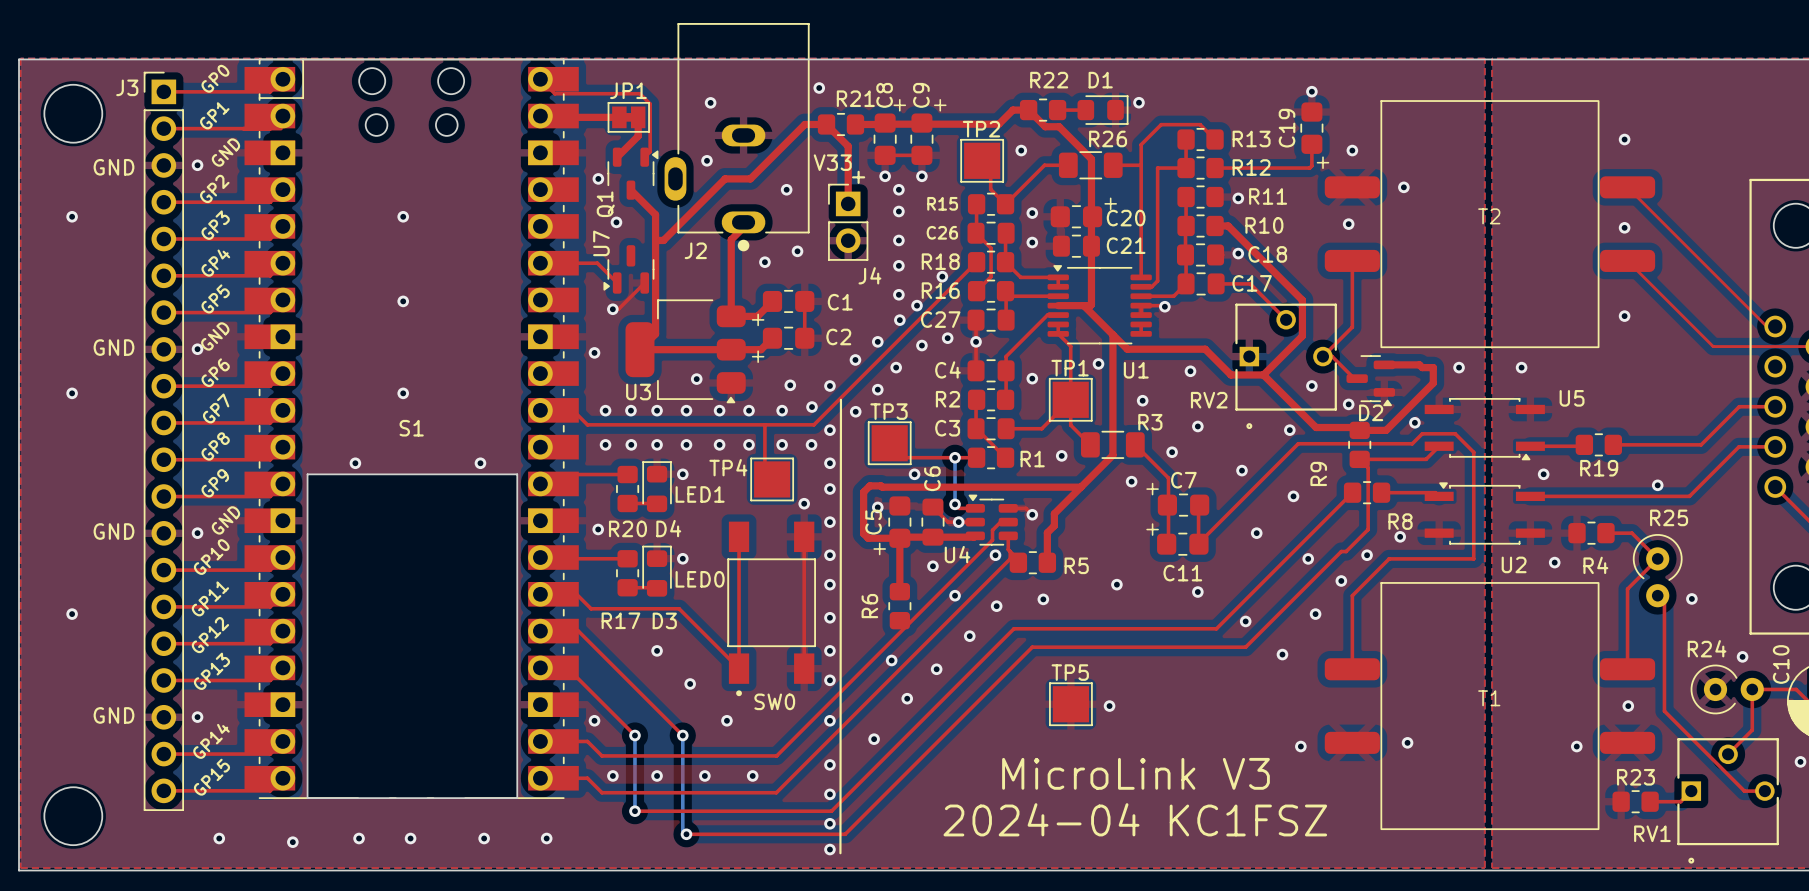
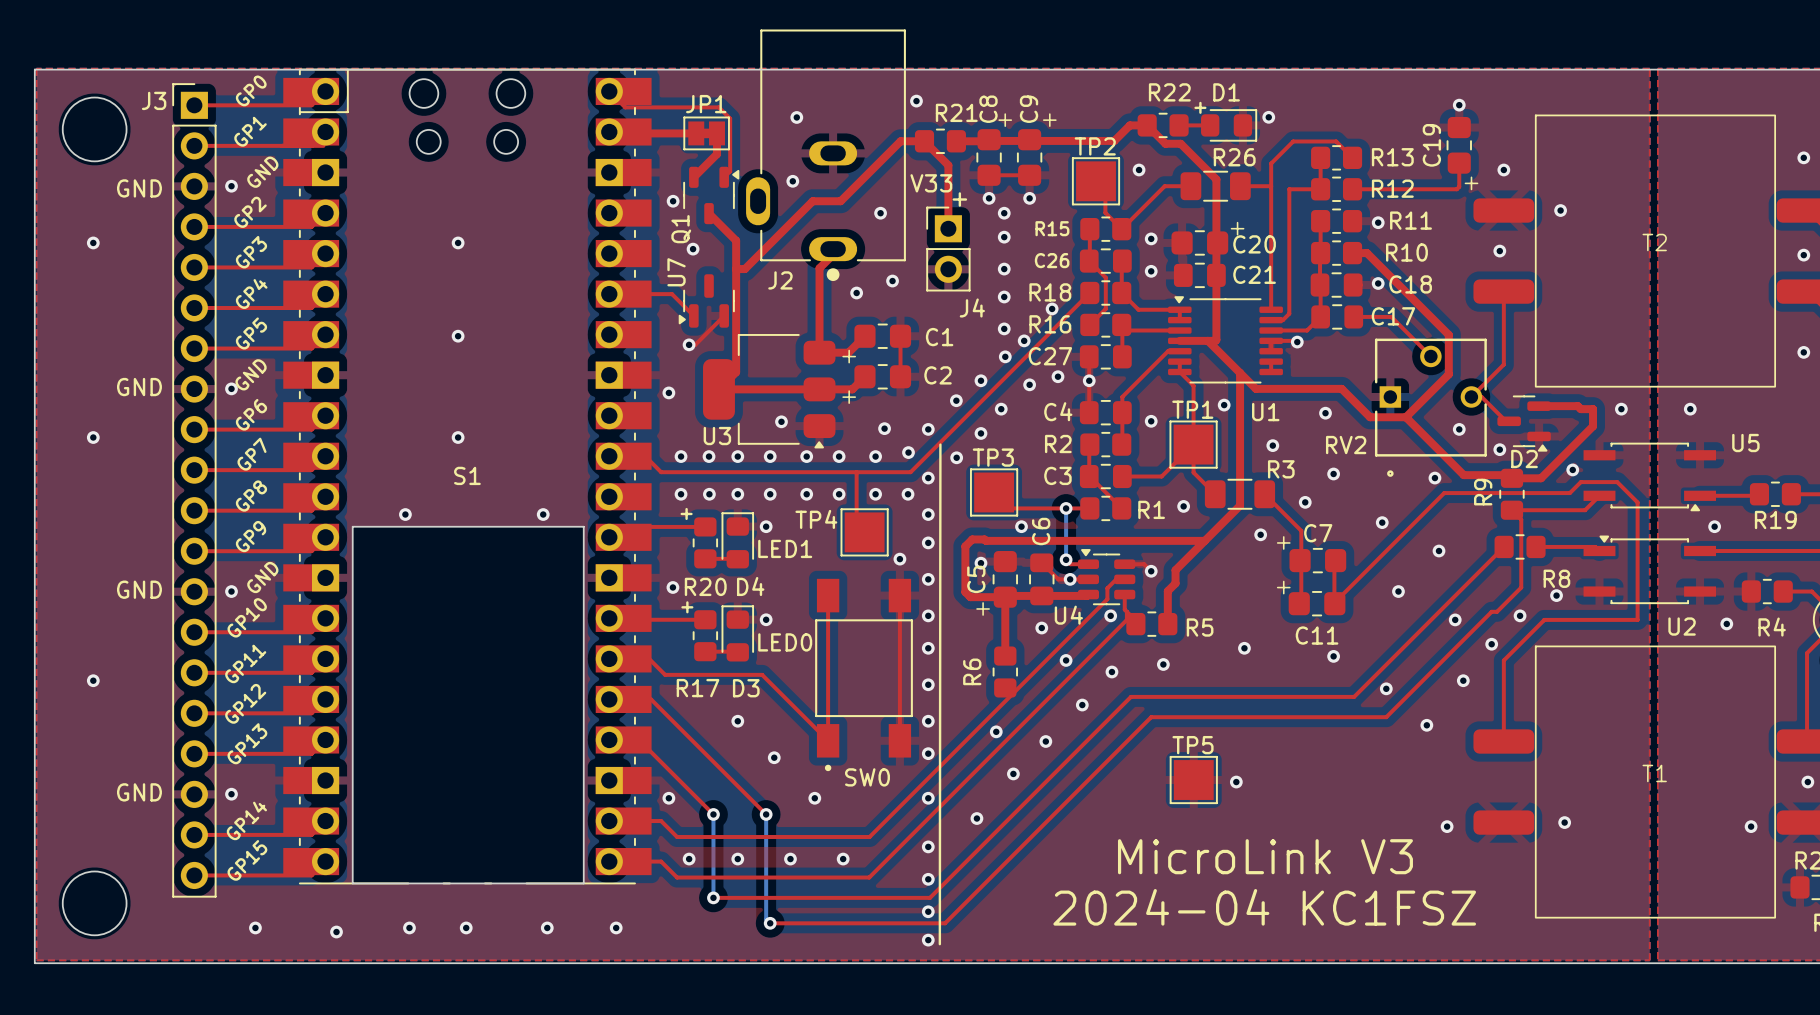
text: none -> + (1200, 107)
text: none -> + (686, 513)
R9 name position: R9 (1318, 473) -> R9 (1483, 492)
text: none -> + (687, 607)

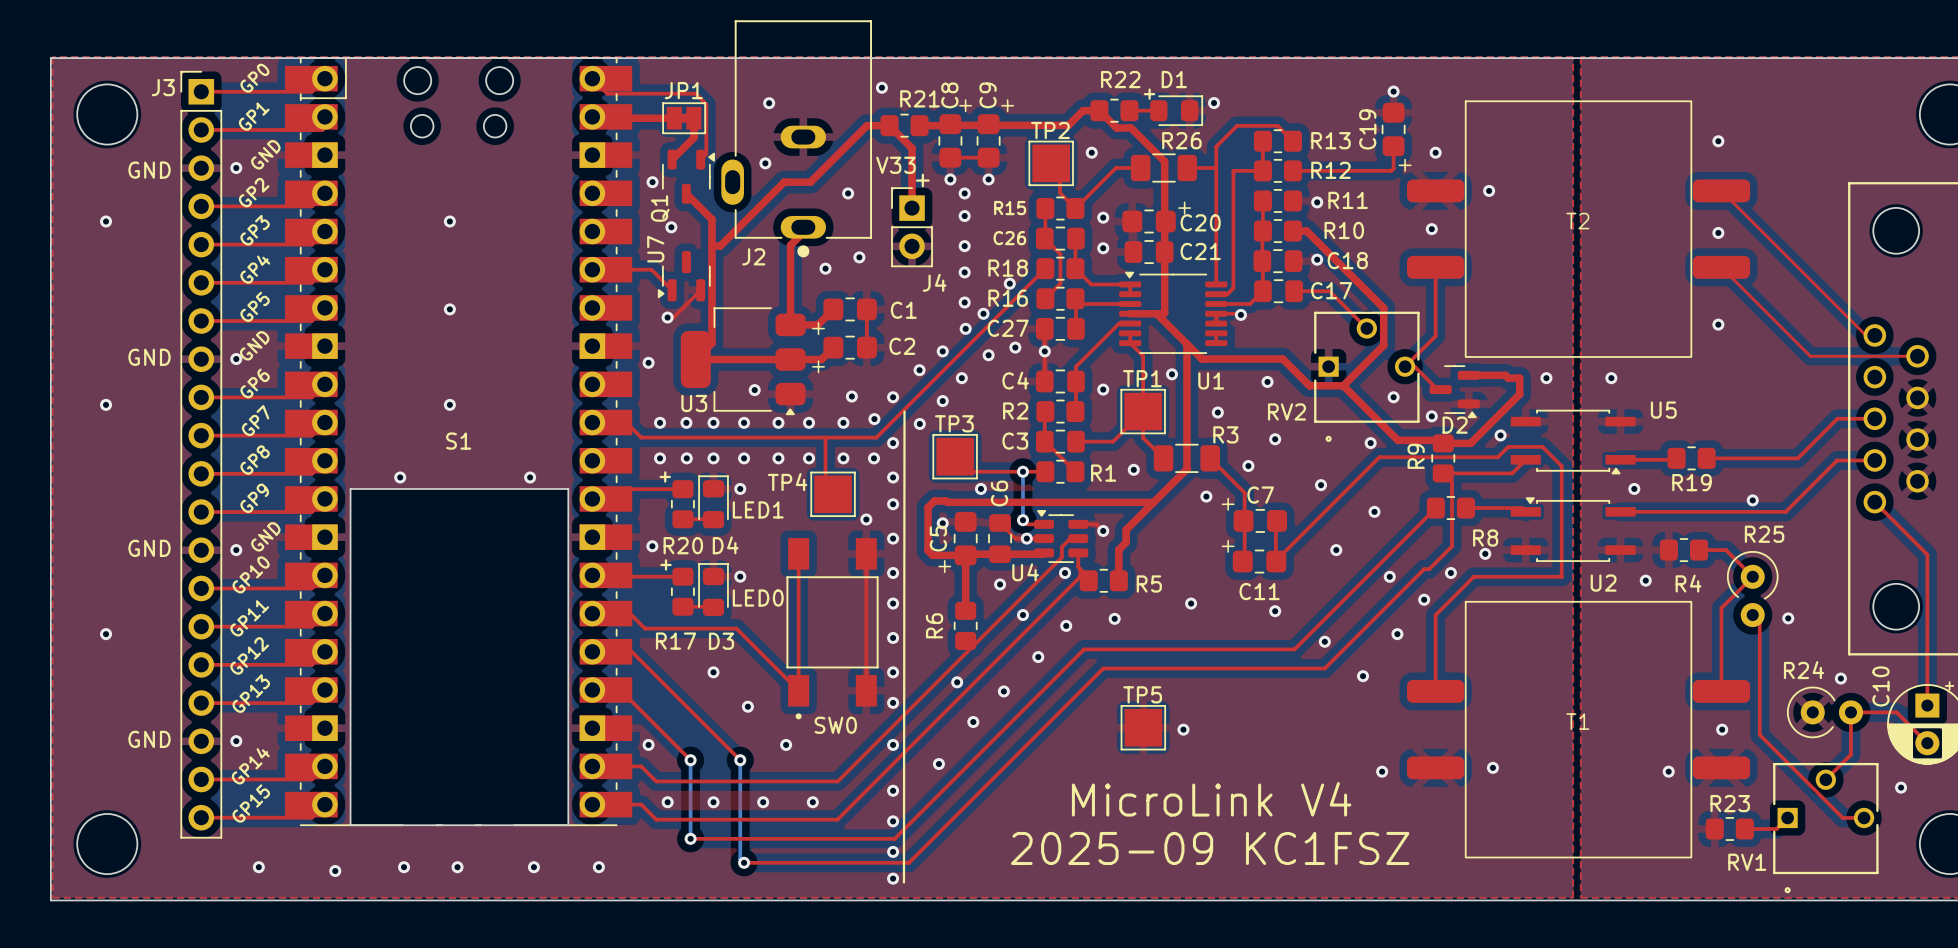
text: MicroLink V3 (1265, 856) -> MicroLink V4 (1211, 799)
text: 2024-04 KC1FSZ (1264, 907) -> 2025-09 KC1FSZ (1210, 848)

